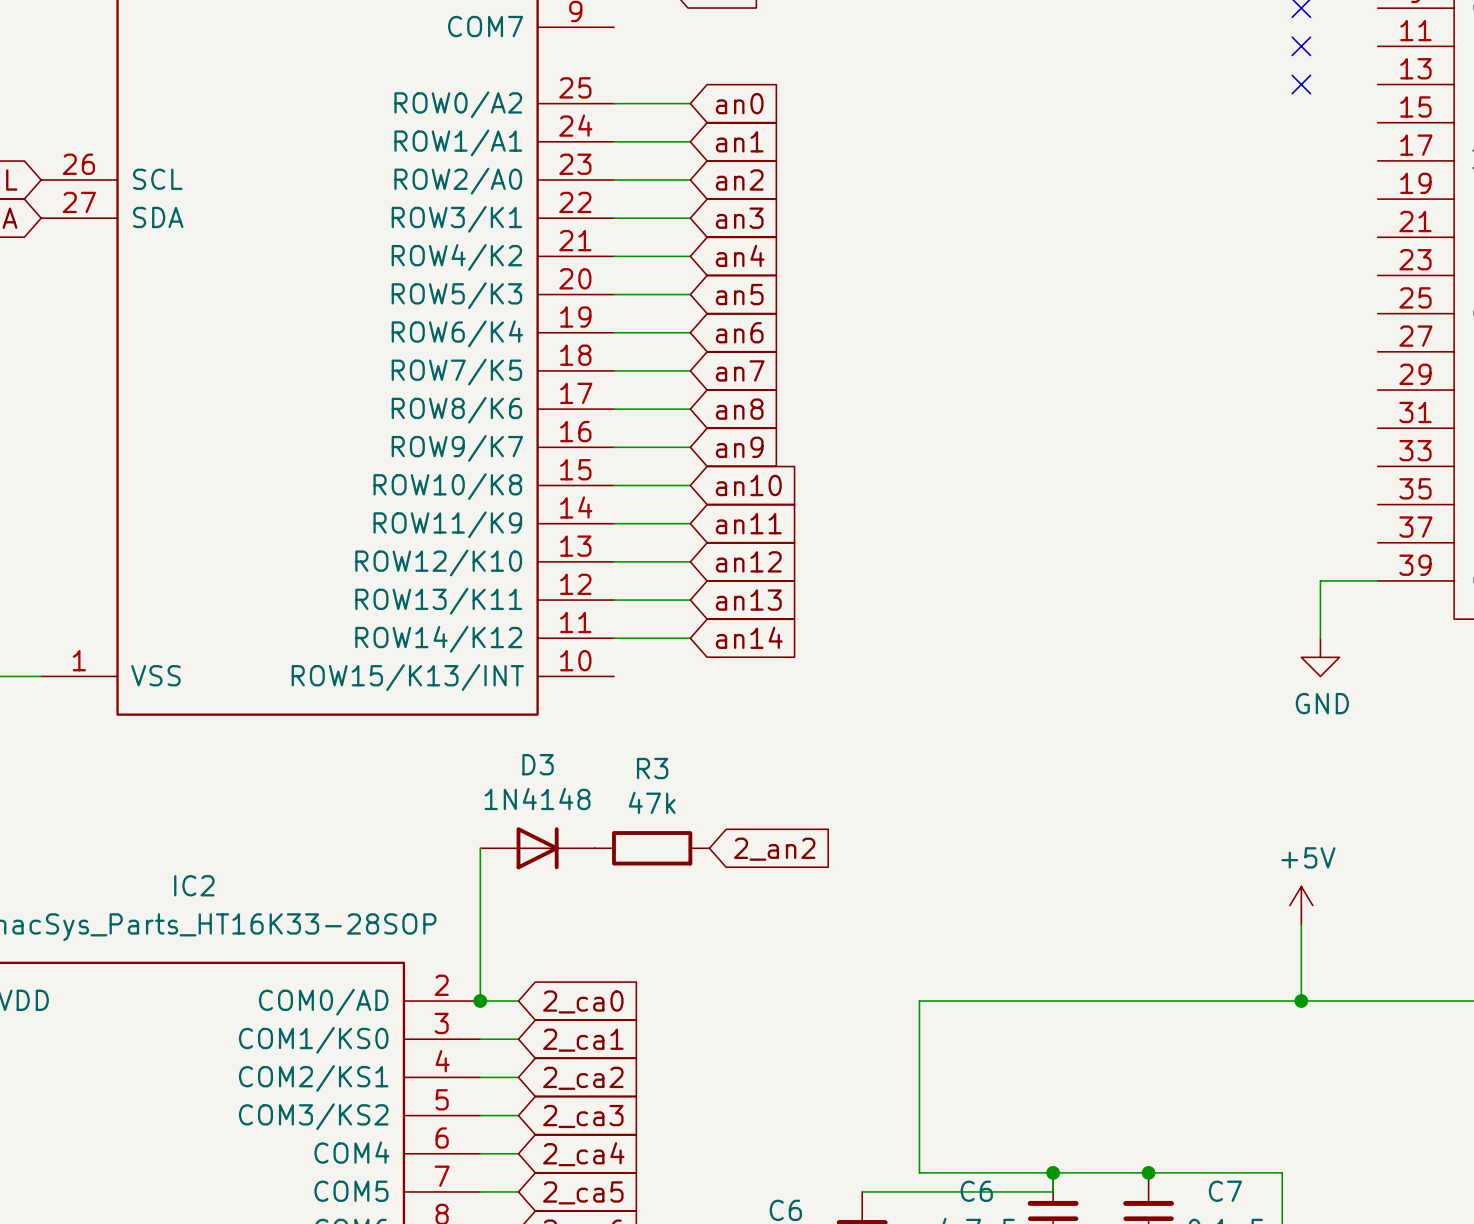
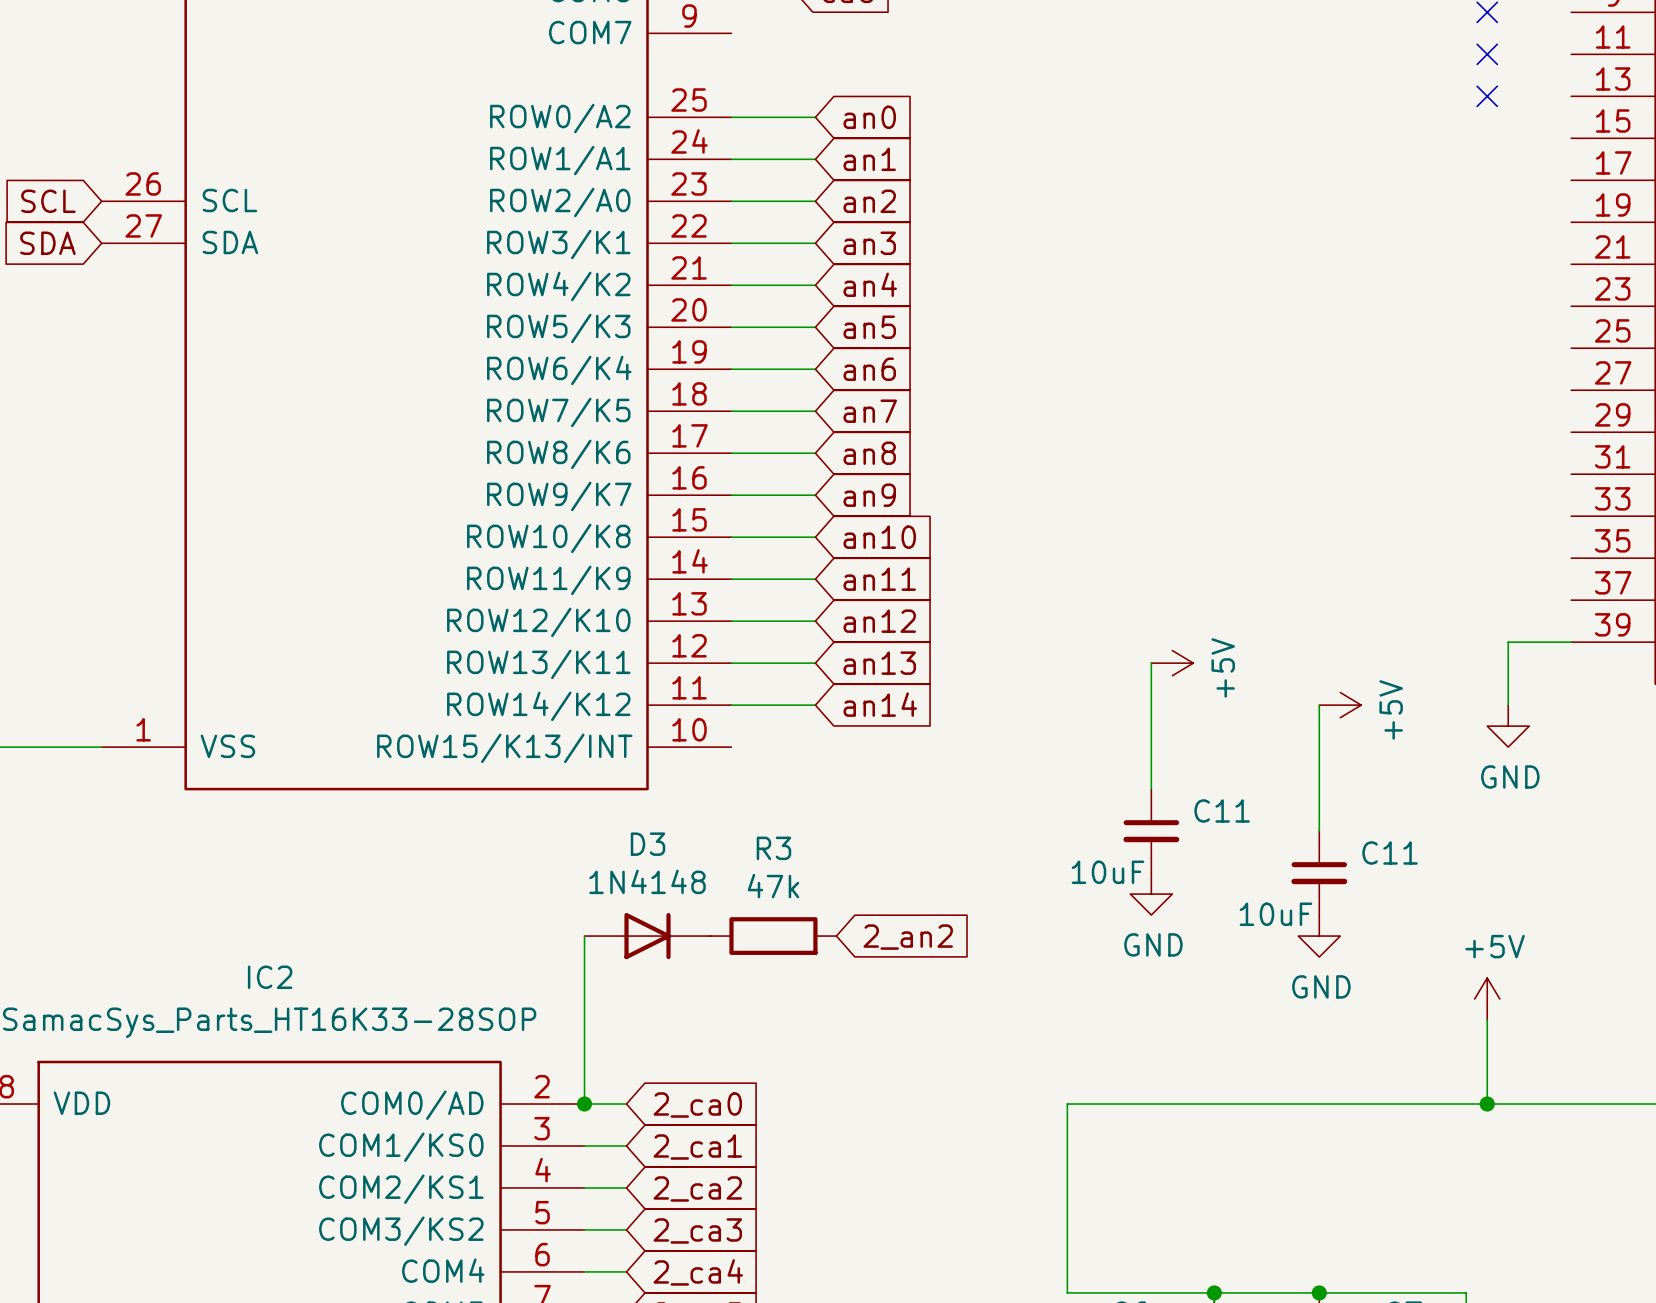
wire: none -> (1151, 663) (1151, 789)
power symbol: none -> +5V (1172, 663)
wire: none -> (1319, 705) (1319, 831)
power symbol: none -> +5V (1340, 705)
C11: none -> 10uF (1151, 831)
C11: none -> 10uF (1319, 873)
power symbol: none -> GND (1151, 894)
power symbol: none -> GND (1319, 936)

